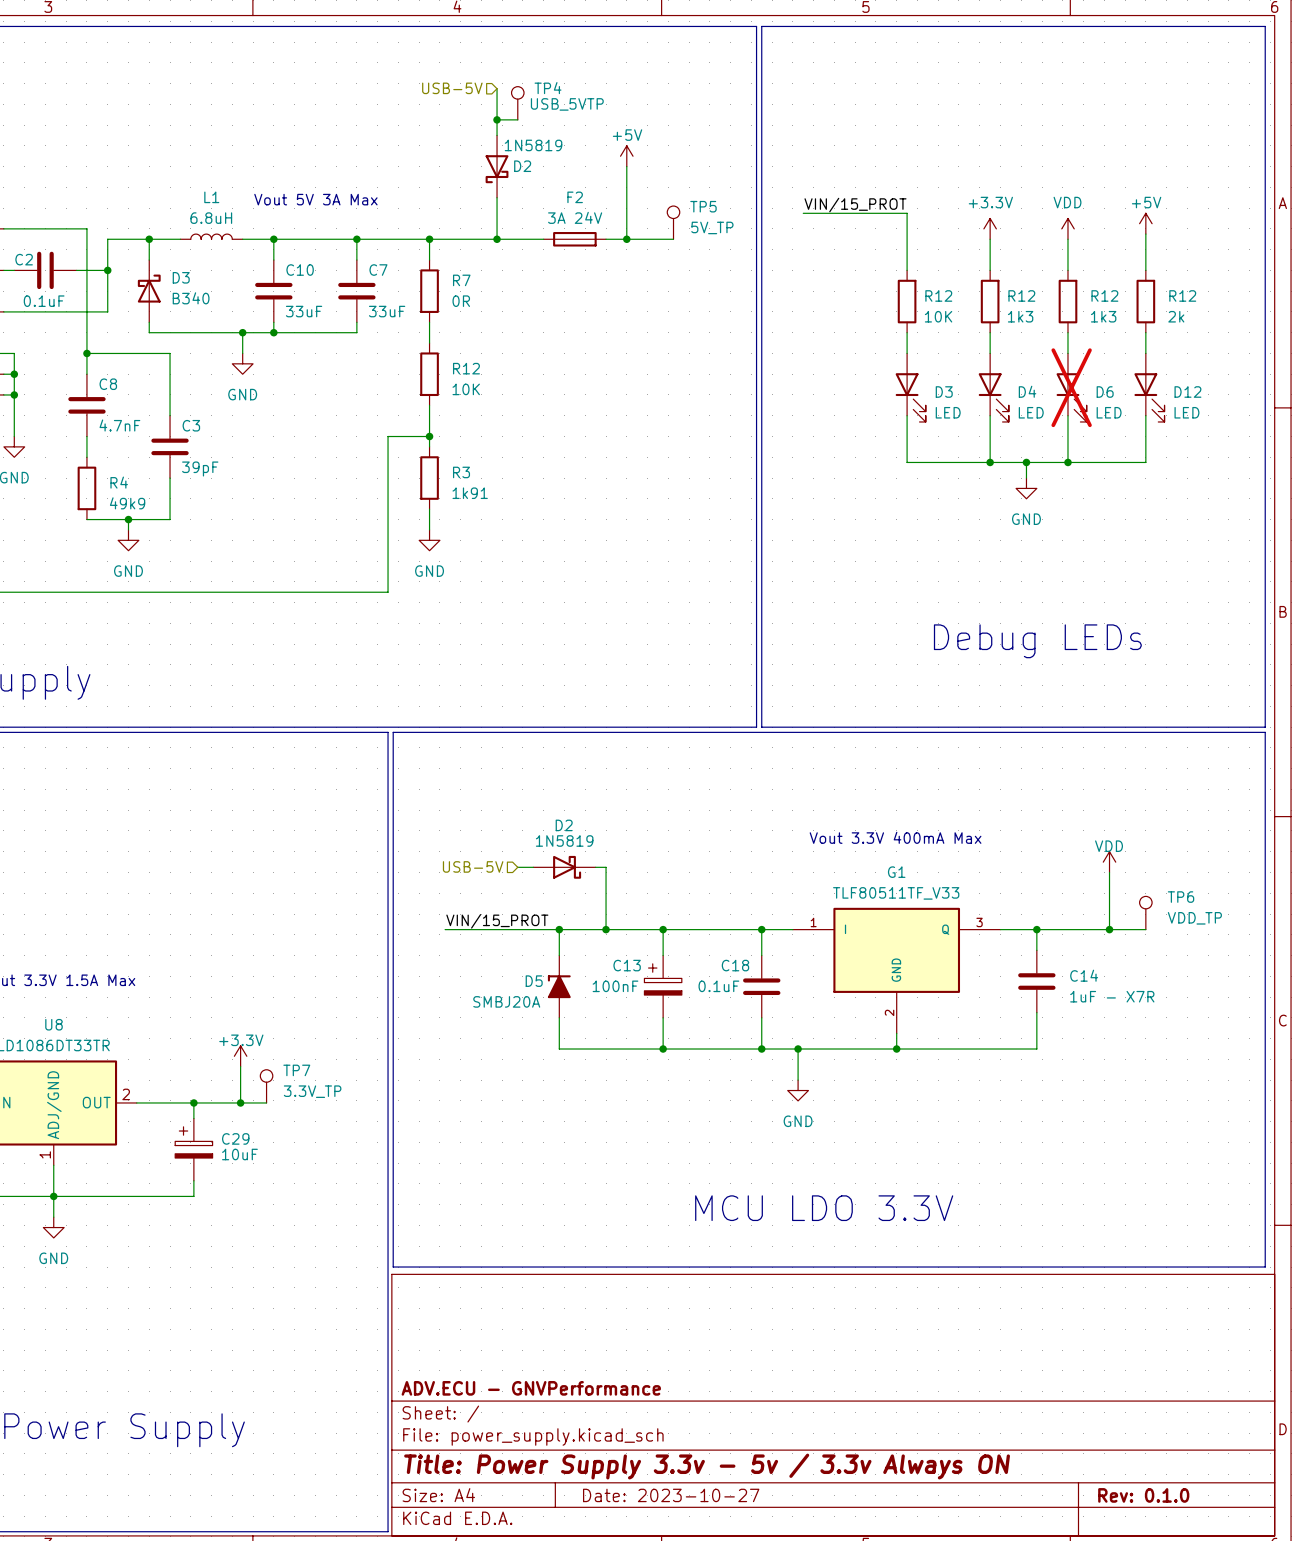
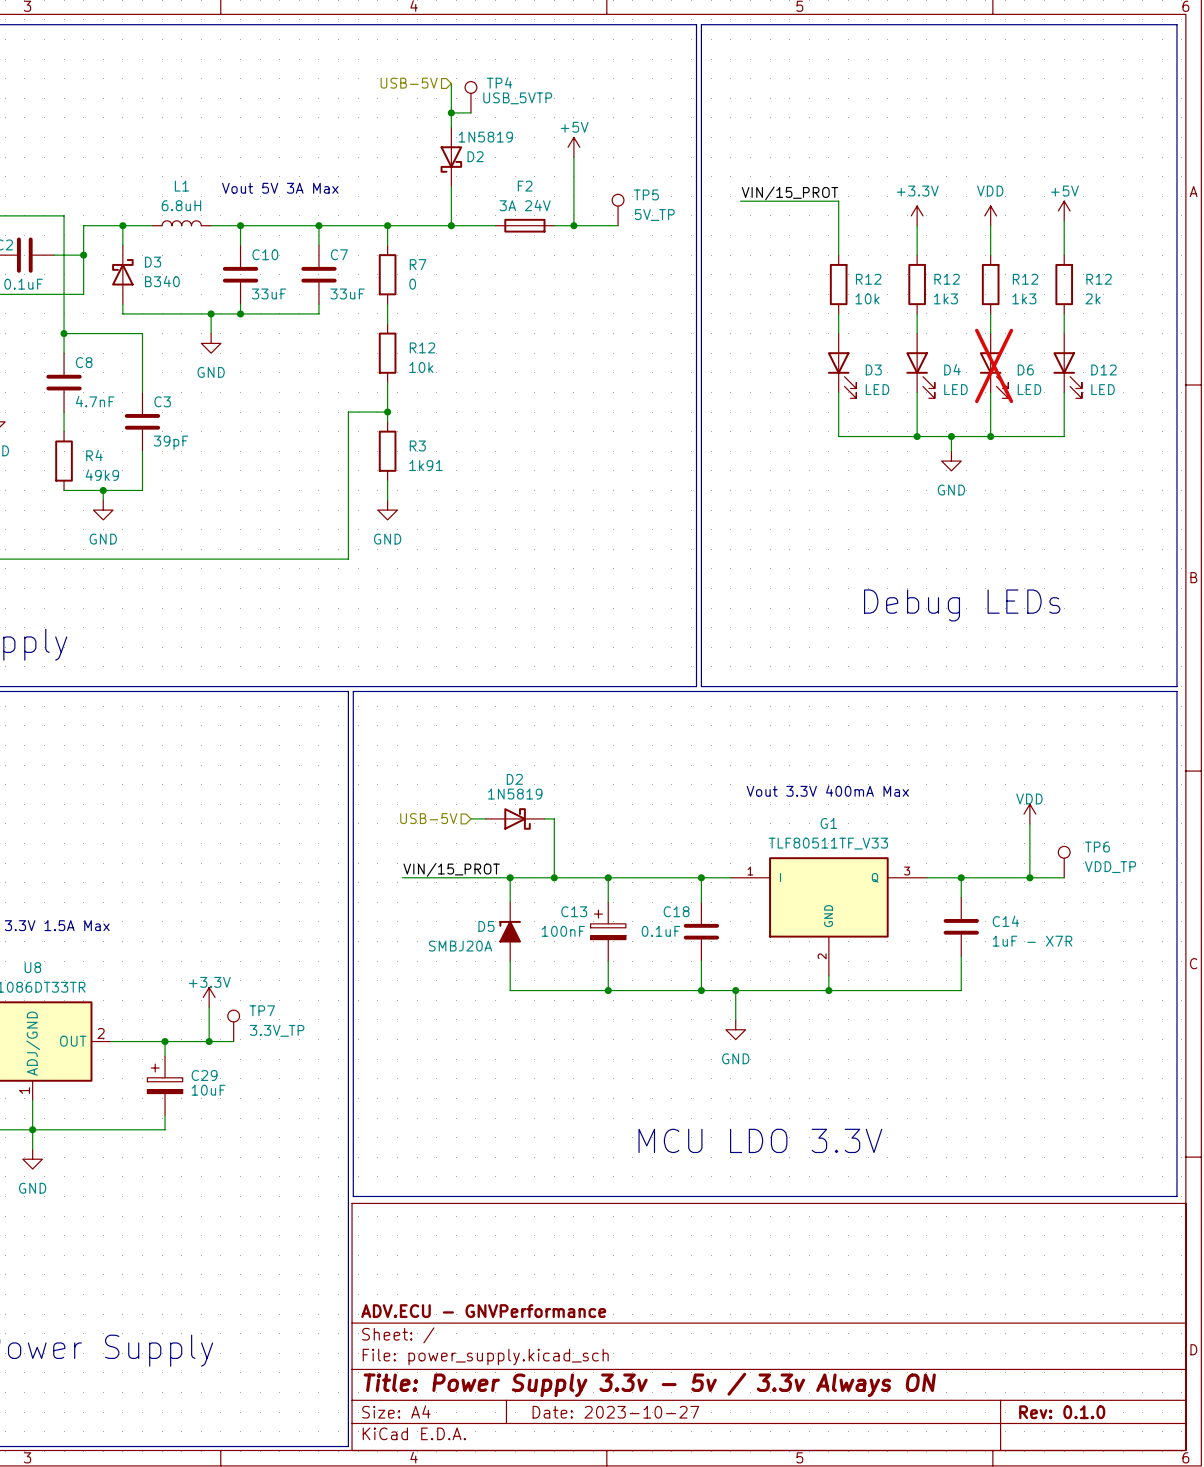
R7 value: 0R (461, 301) -> 0 (412, 284)
R12 value: 10K (938, 316) -> 10k (867, 298)
R12 value: 10K (466, 389) -> 10k (421, 367)

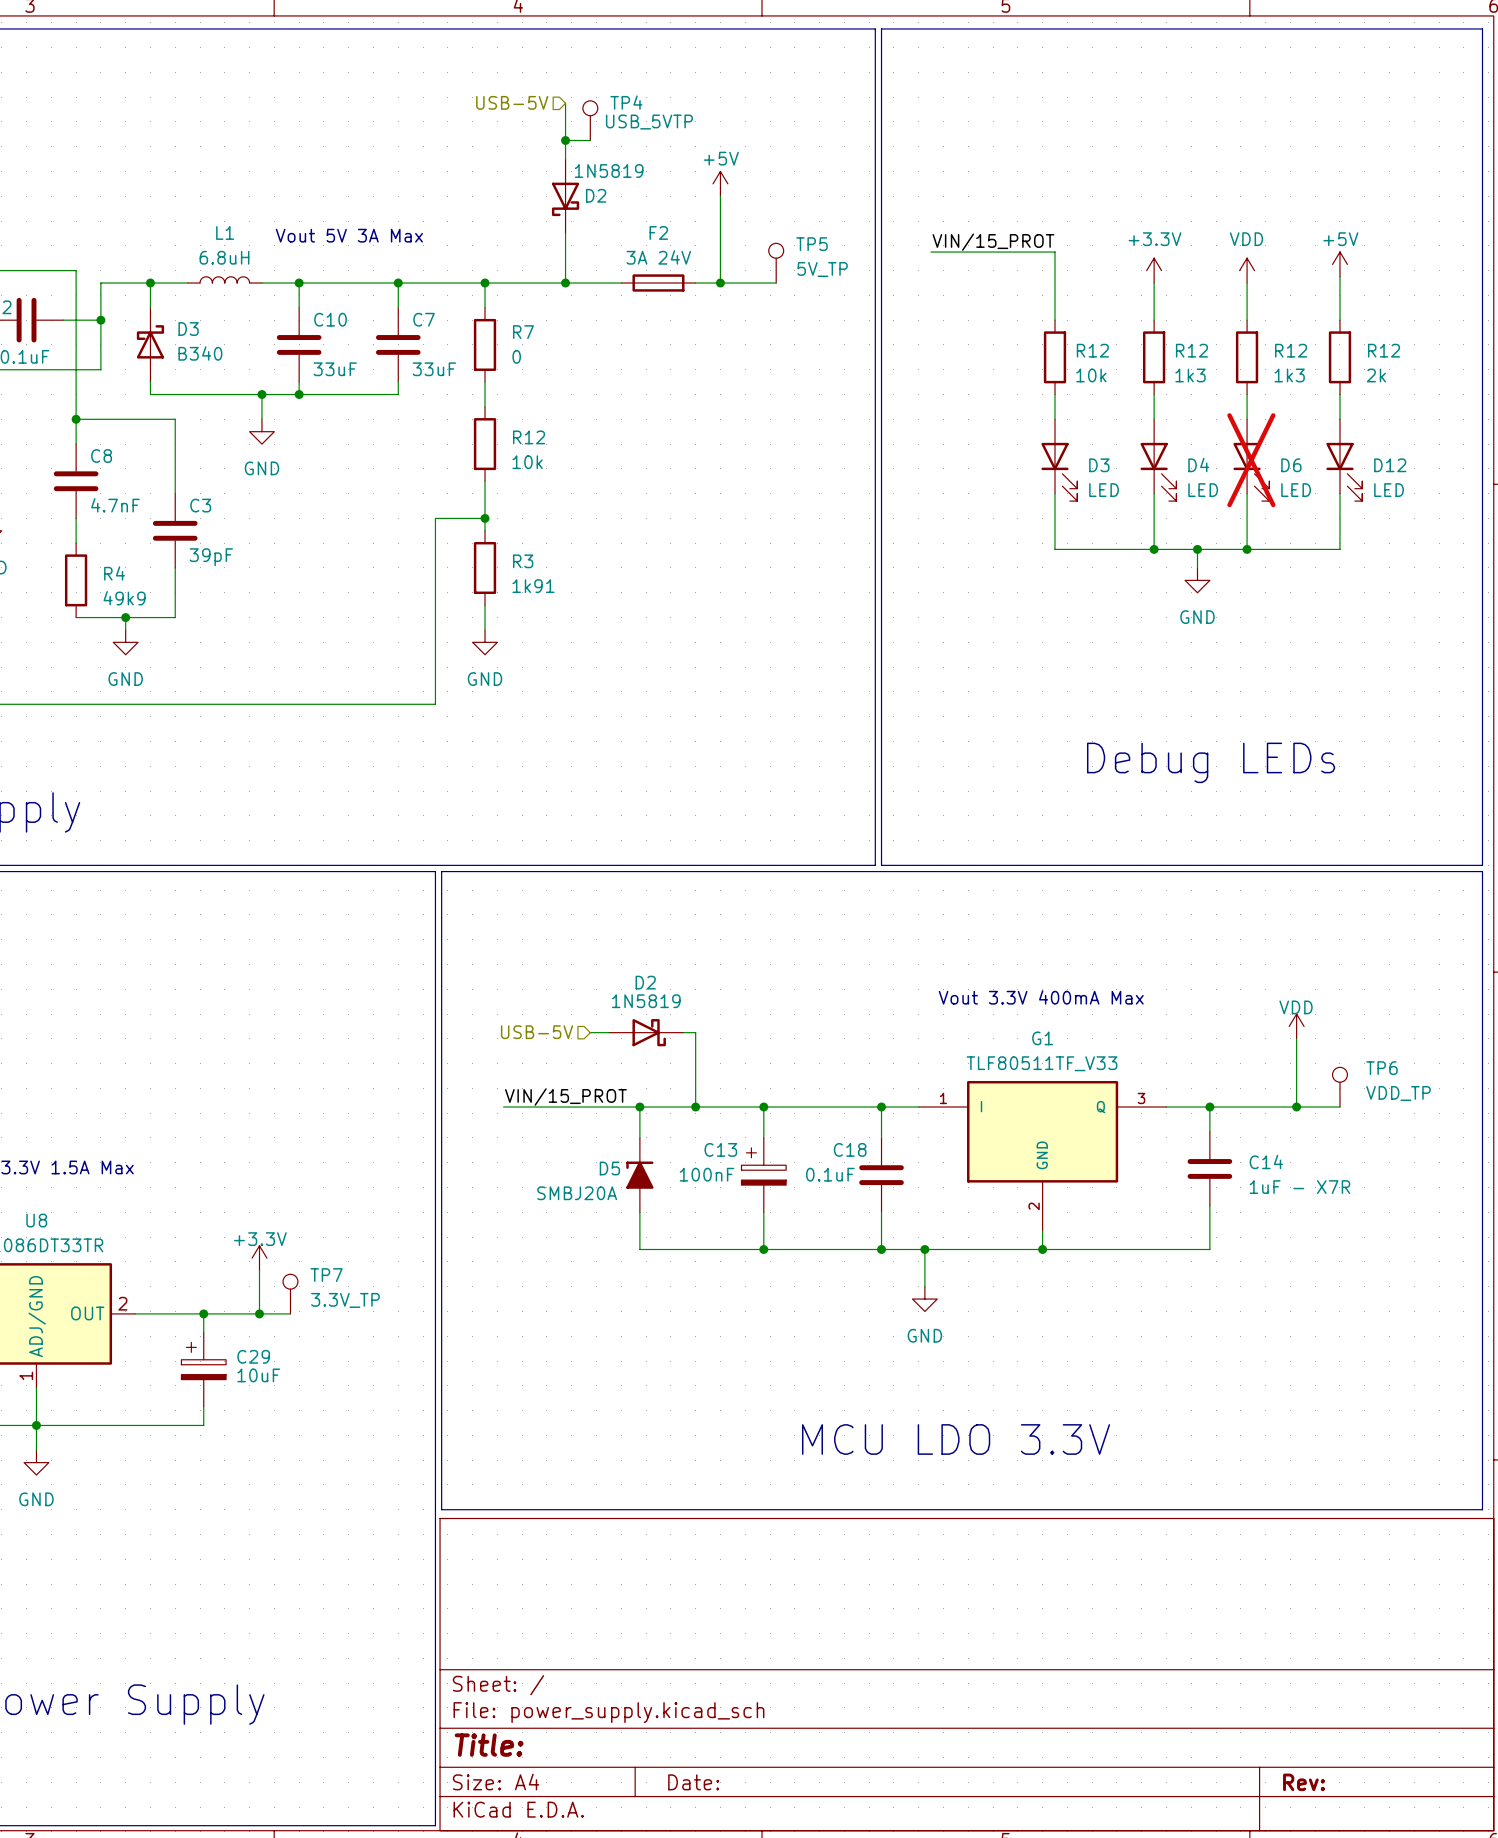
title block: ADV.ECU - GNVPerformance (483, 1311) -> none
title block: Title: Power Supply 3.3v - 5v / 3.3v Always ON (649, 1384) -> Title: (489, 1745)
title block: Date: 2023-10-27 (615, 1412) -> Date: (693, 1782)
title block: Rev: 0.1.0 (1062, 1412) -> Rev: (1304, 1782)

